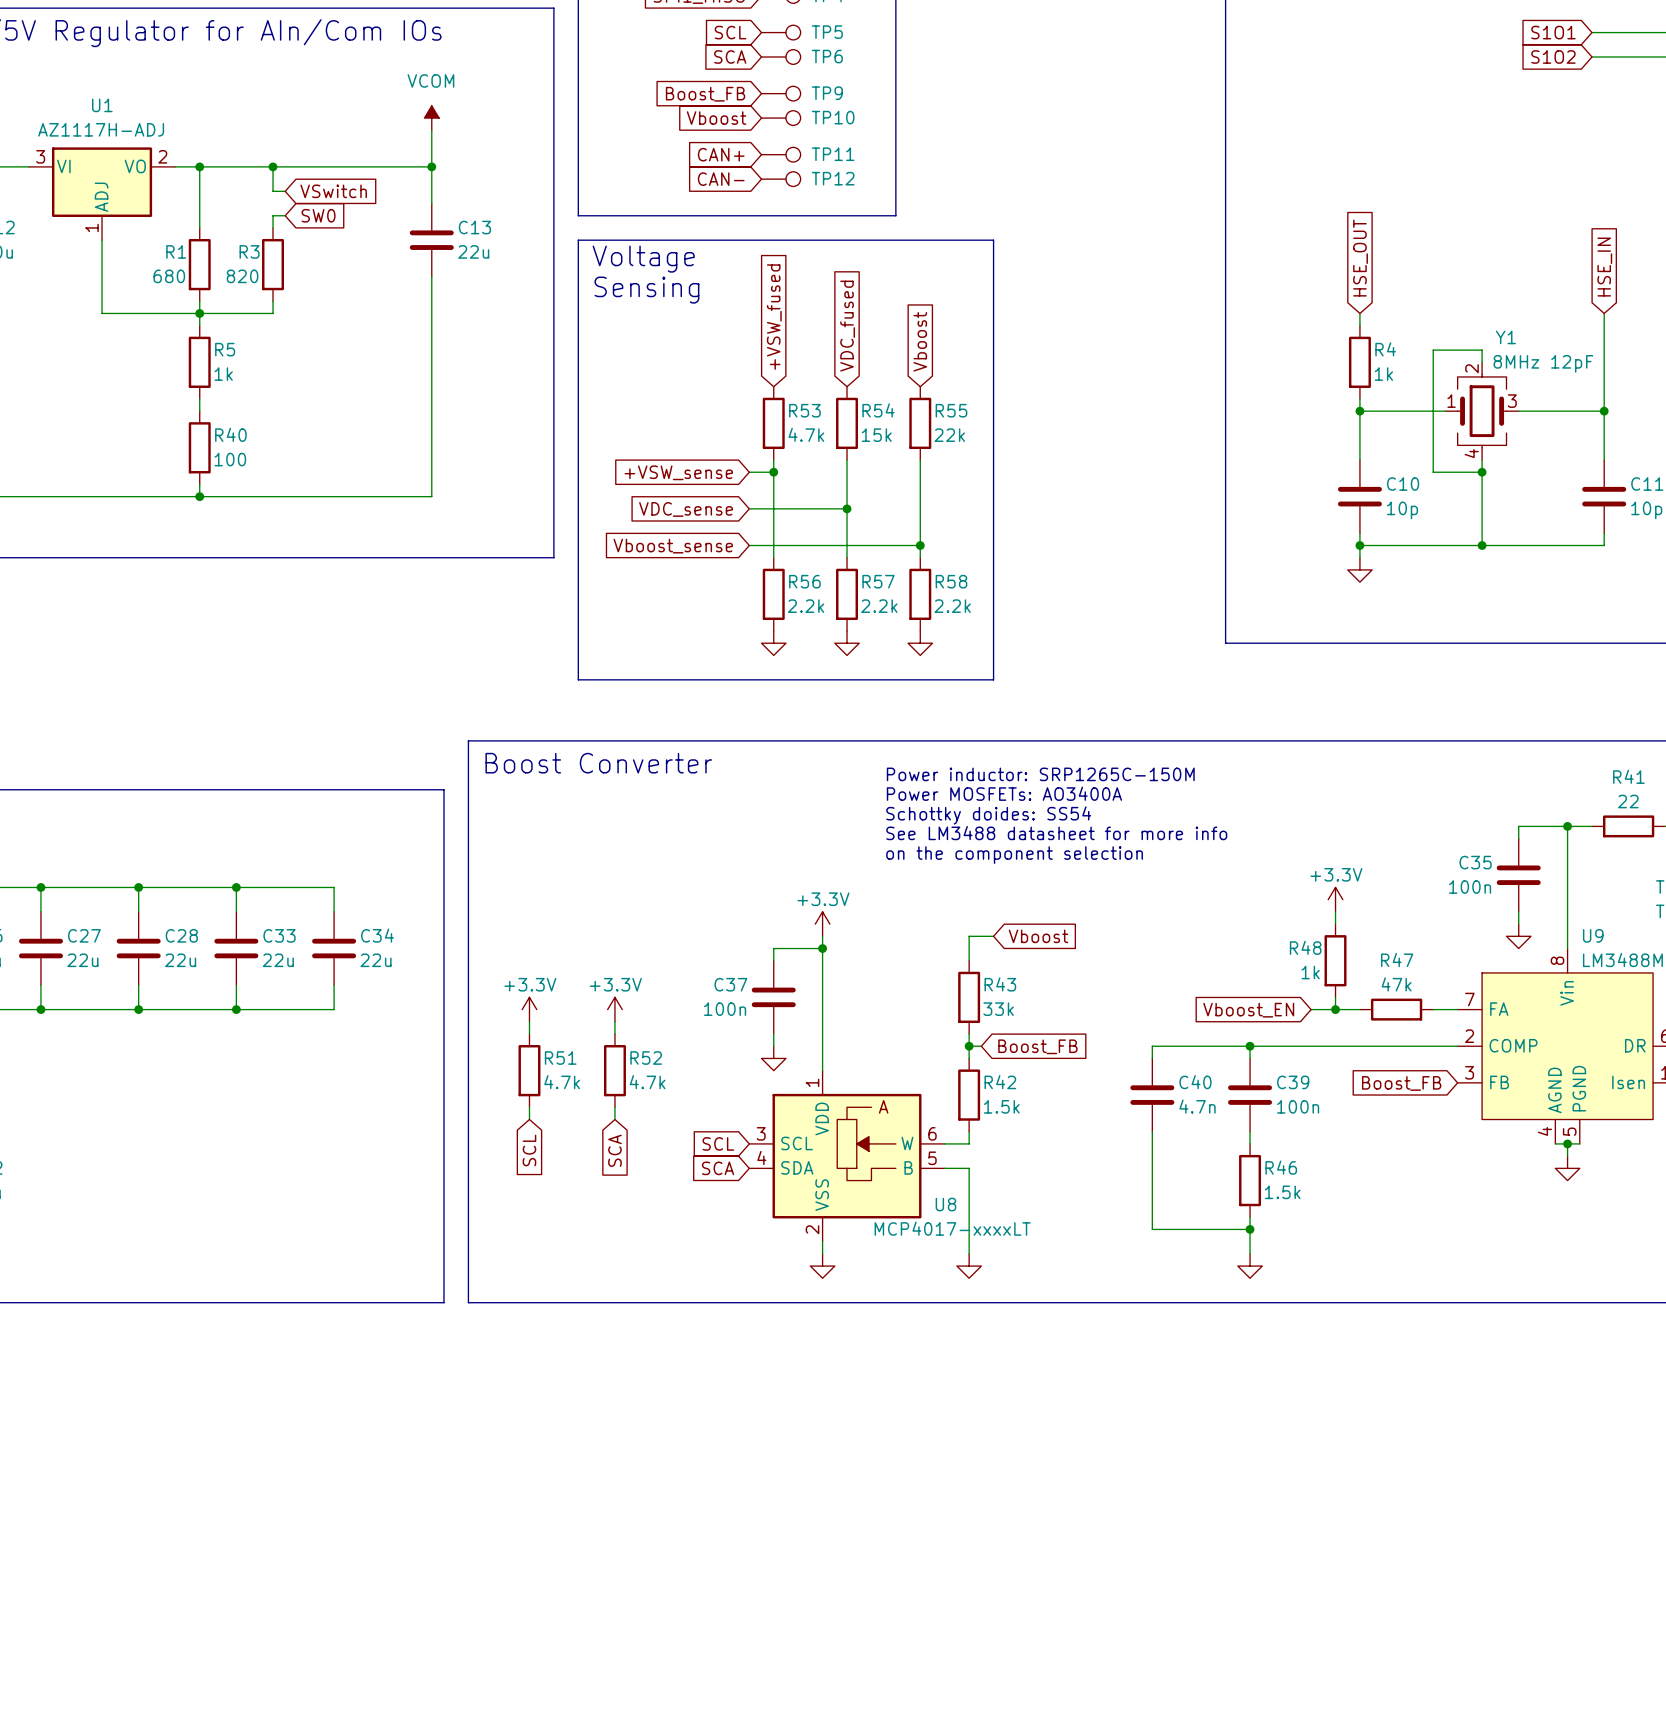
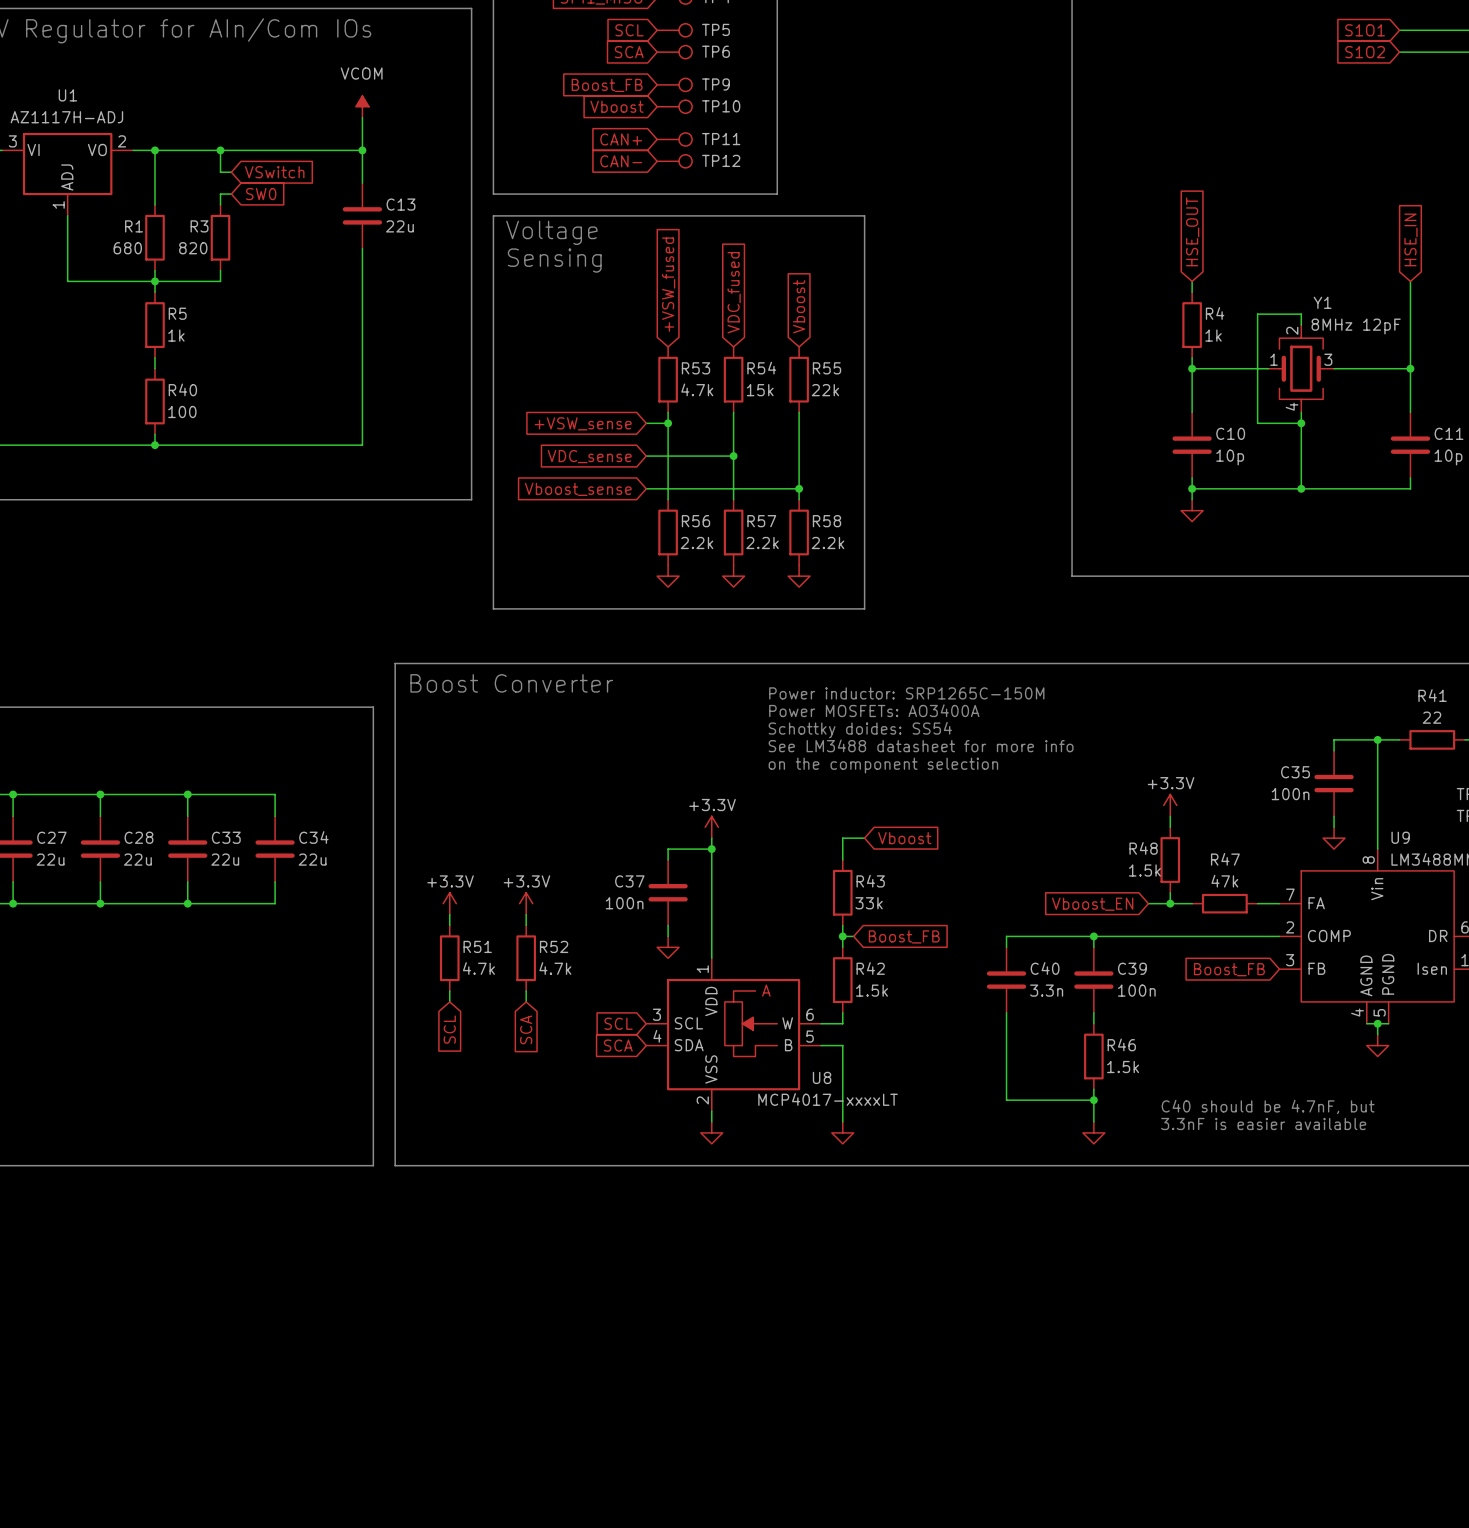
R48 value: 1k (1310, 972) -> 1.5k (1144, 870)
C40 value: 4.7n (1197, 1106) -> 3.3n (1046, 990)
text: none -> C40 should be 4.7nF, but (1268, 1106)
text: none -> 3.3nF is easier available (1263, 1123)

